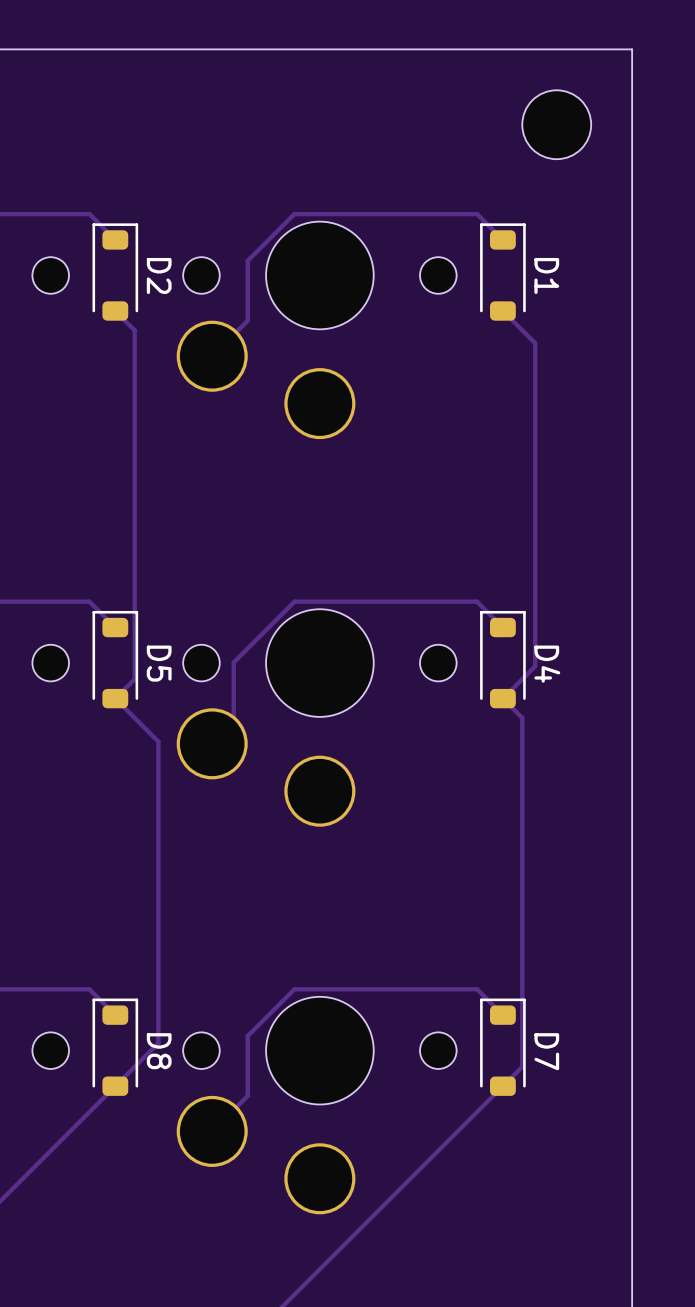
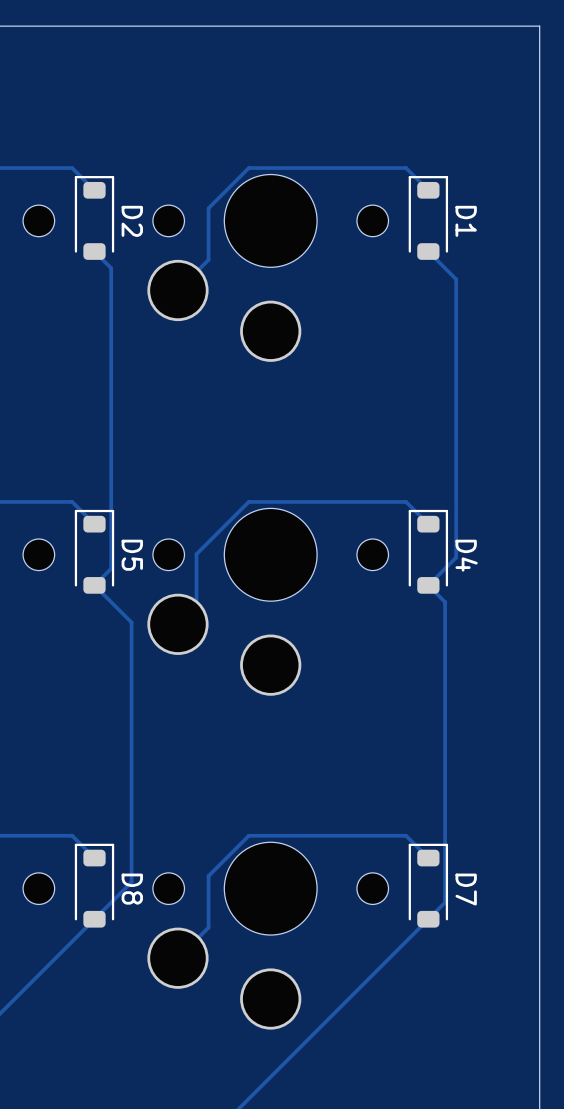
part: (556, 124) -> none

